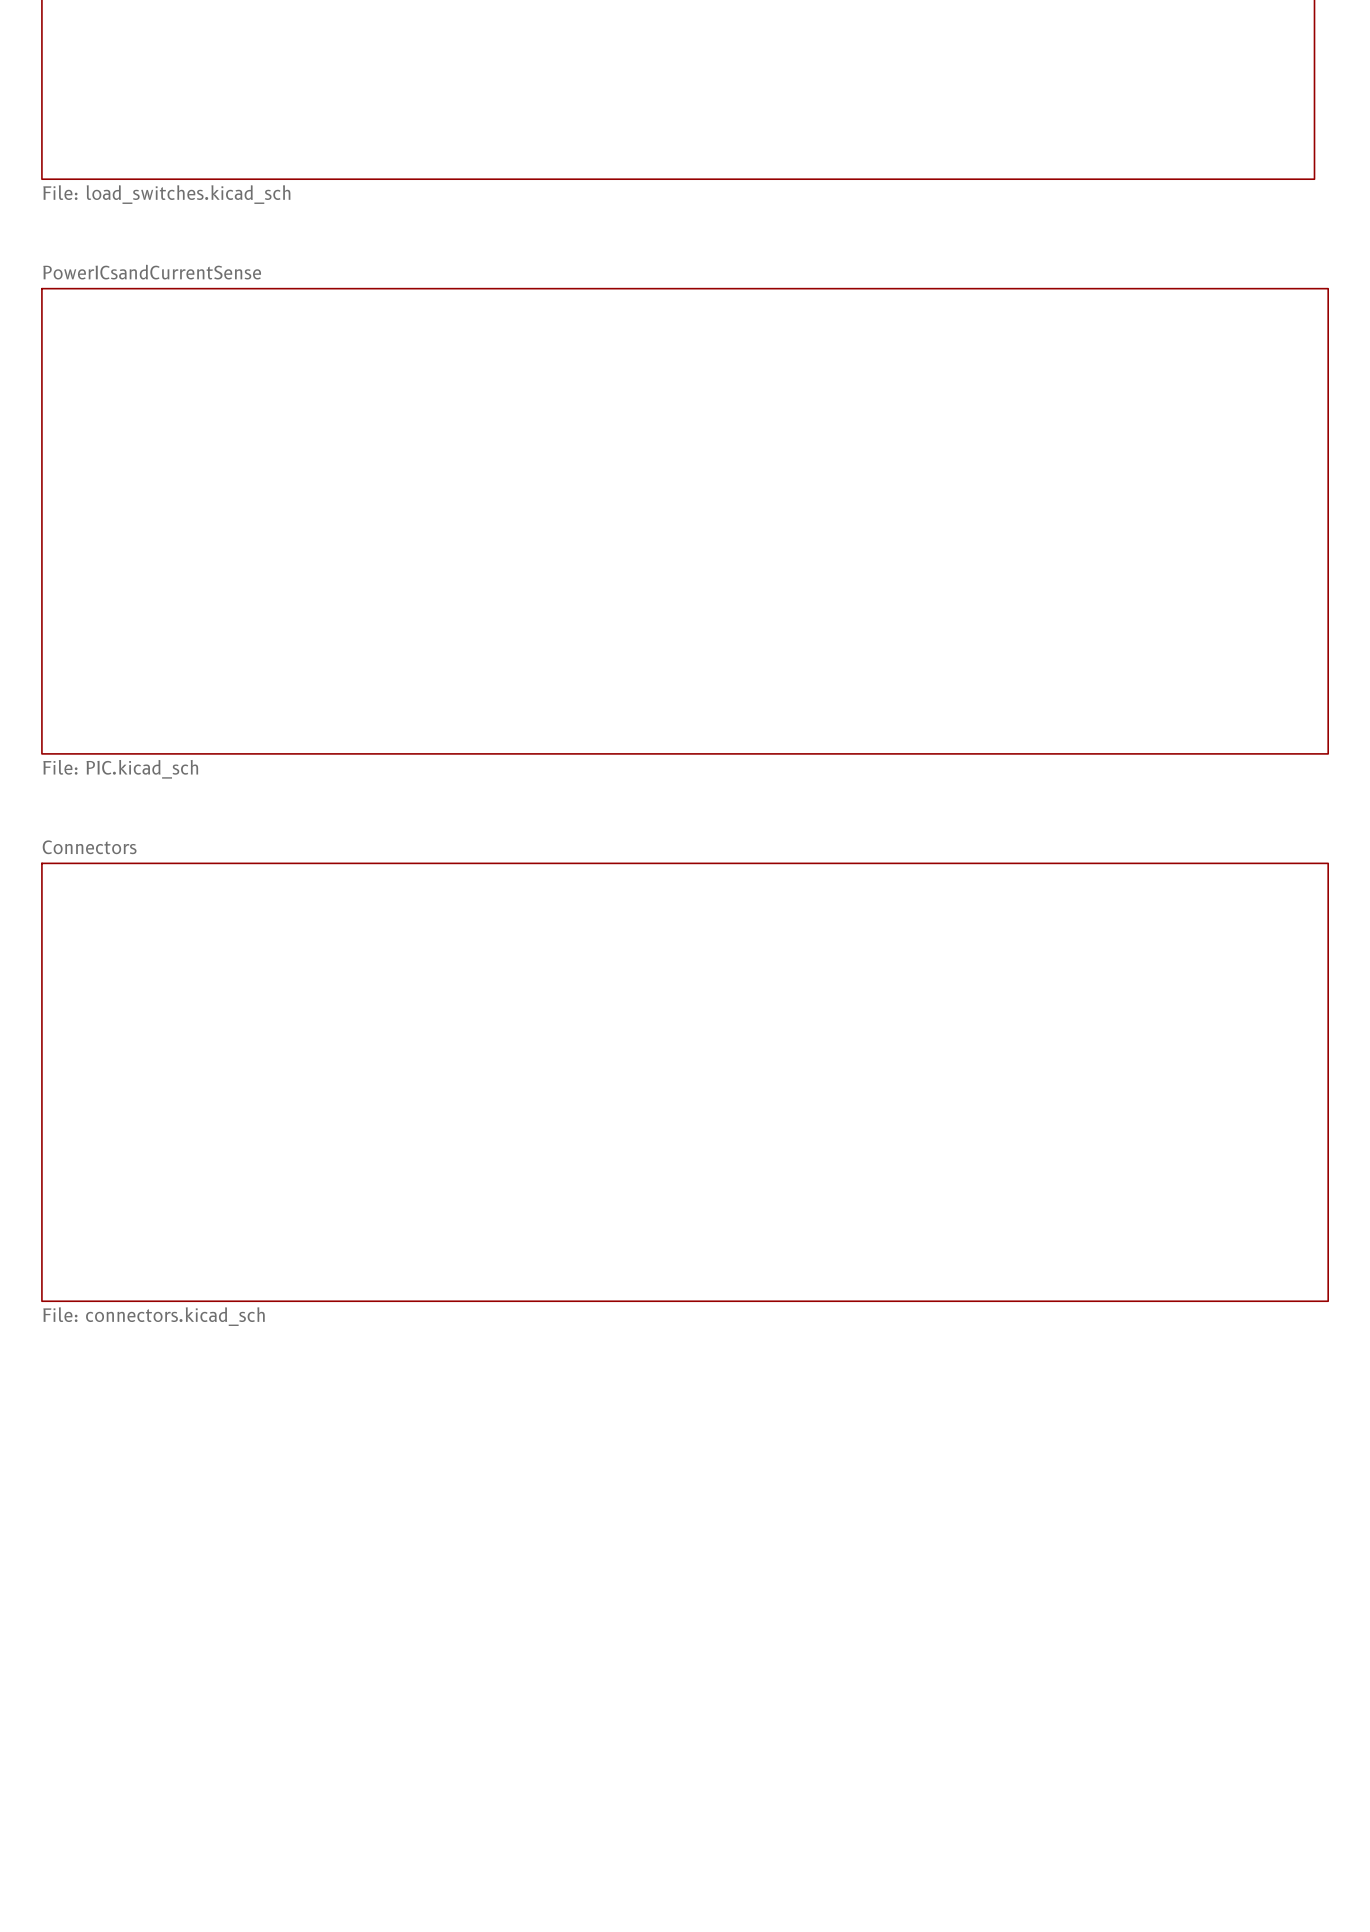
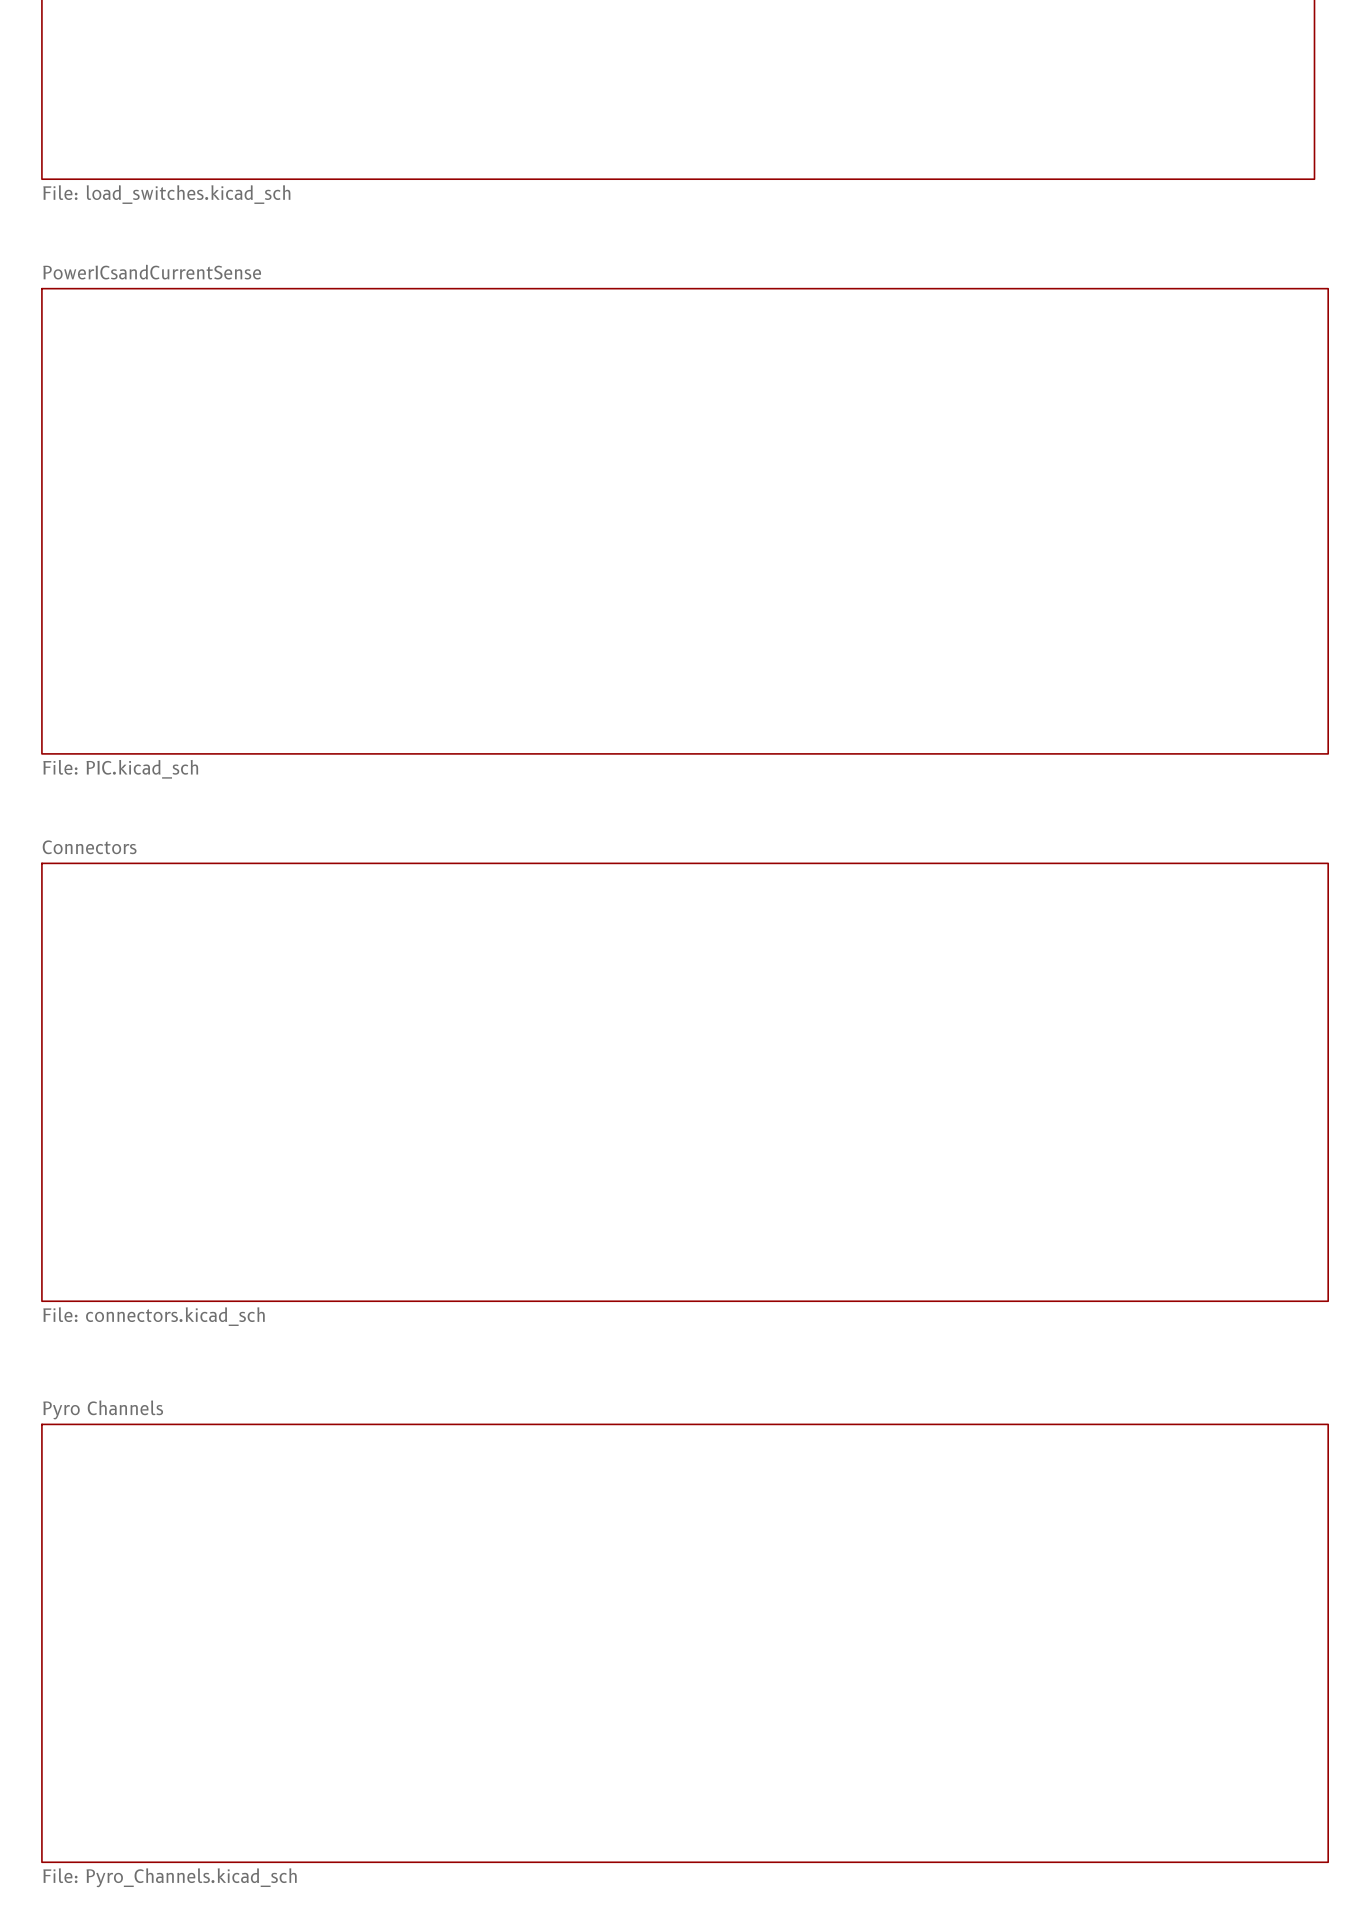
sheet Pyro Channels: none -> File: Pyro_Channels.kicad_sch (685, 1643)

